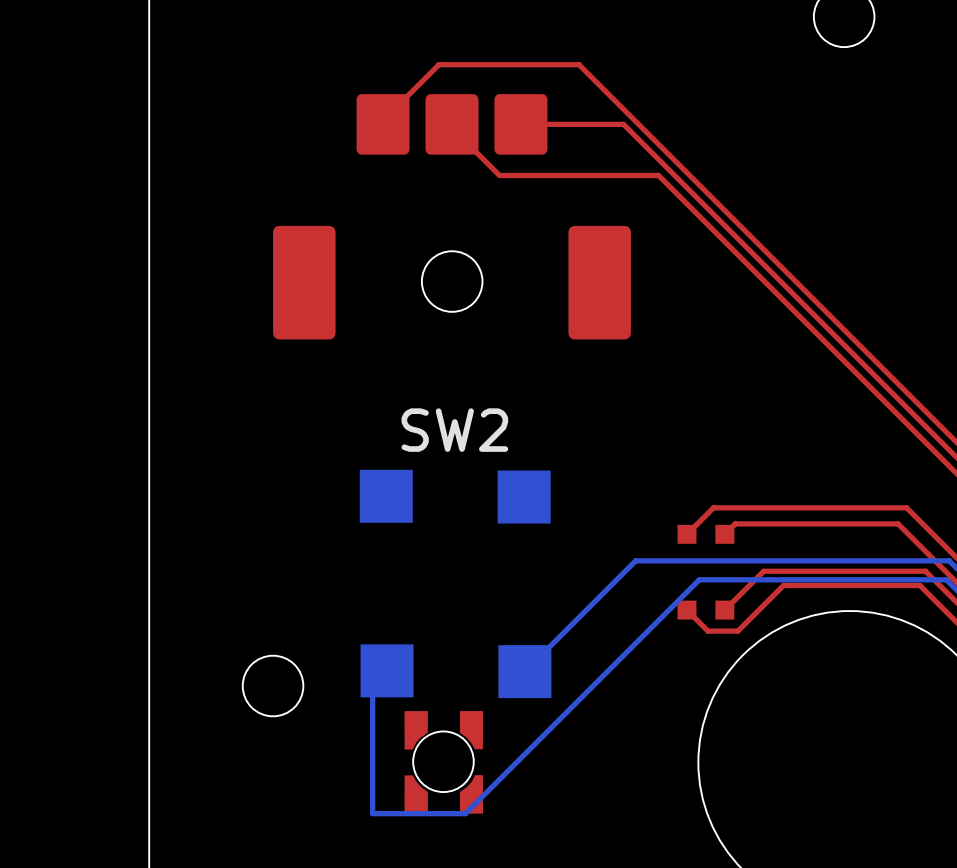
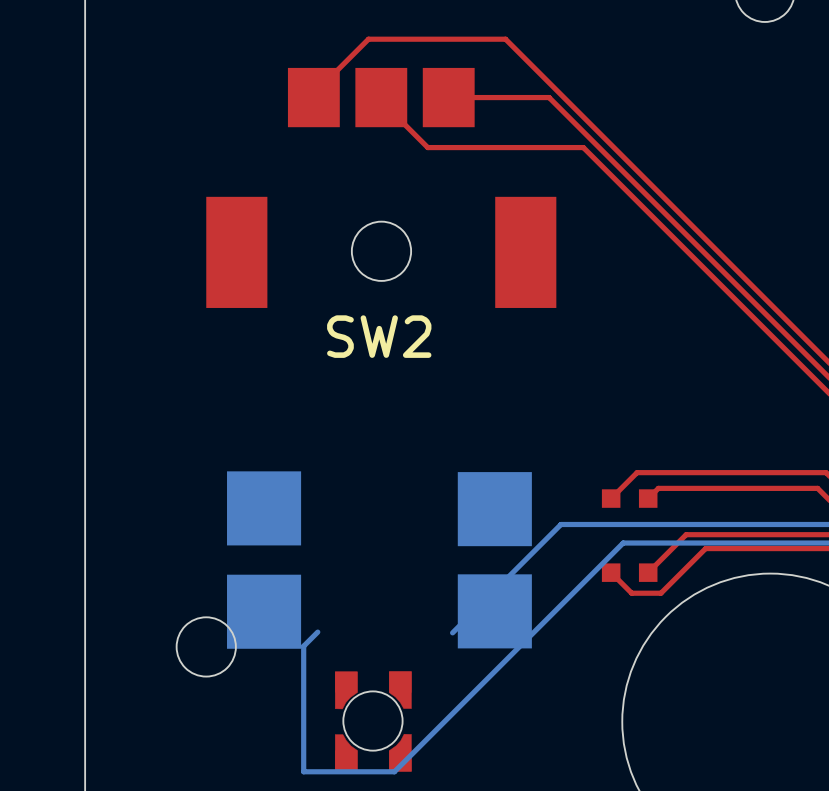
part footprint: [273, 94, 631, 340] -> [206, 67, 557, 308]
SW2 footprint: [359, 469, 552, 699] -> [227, 471, 532, 649]

